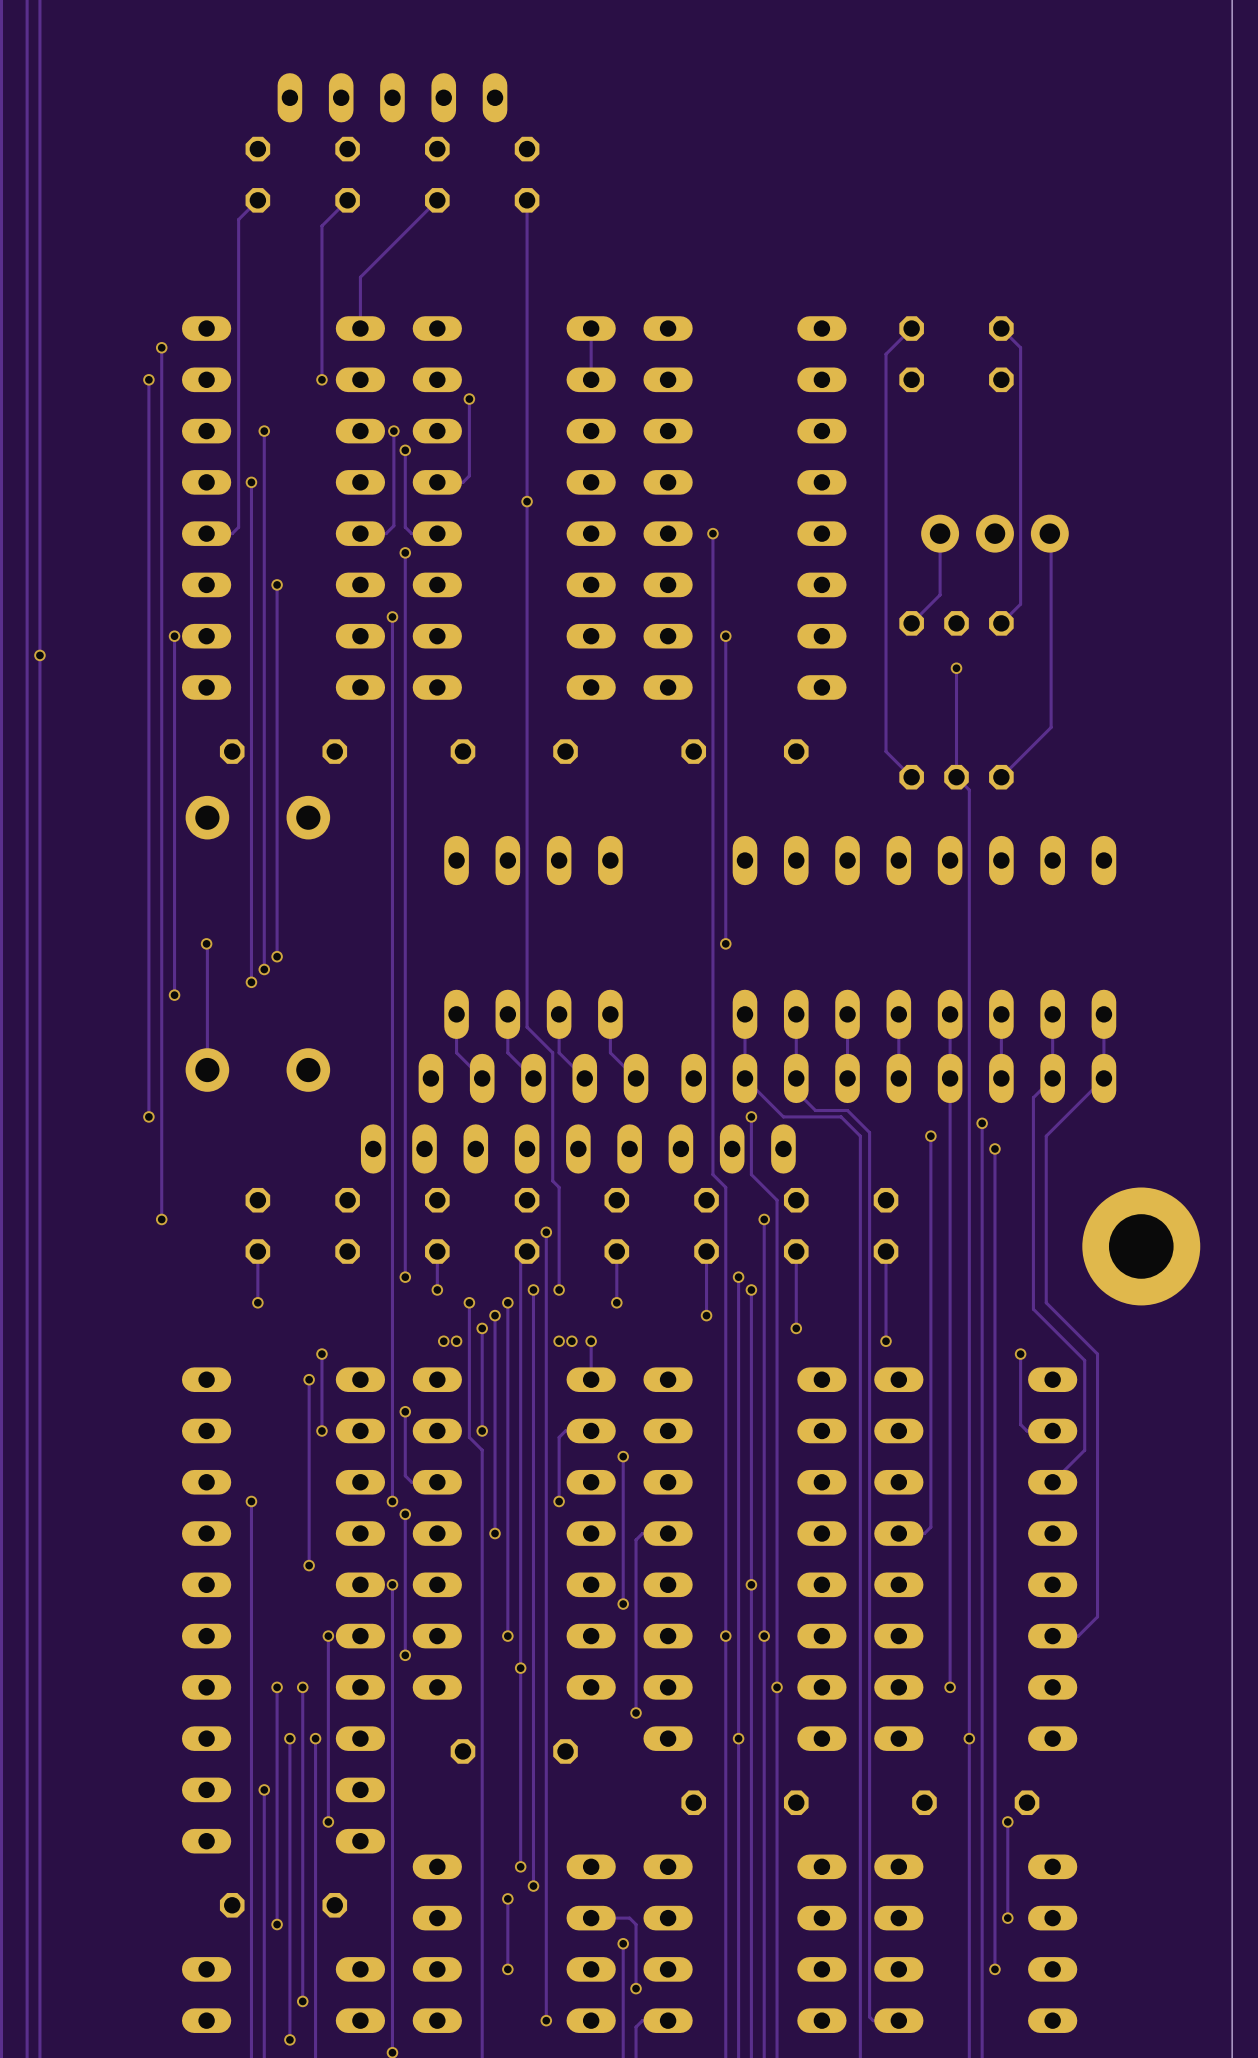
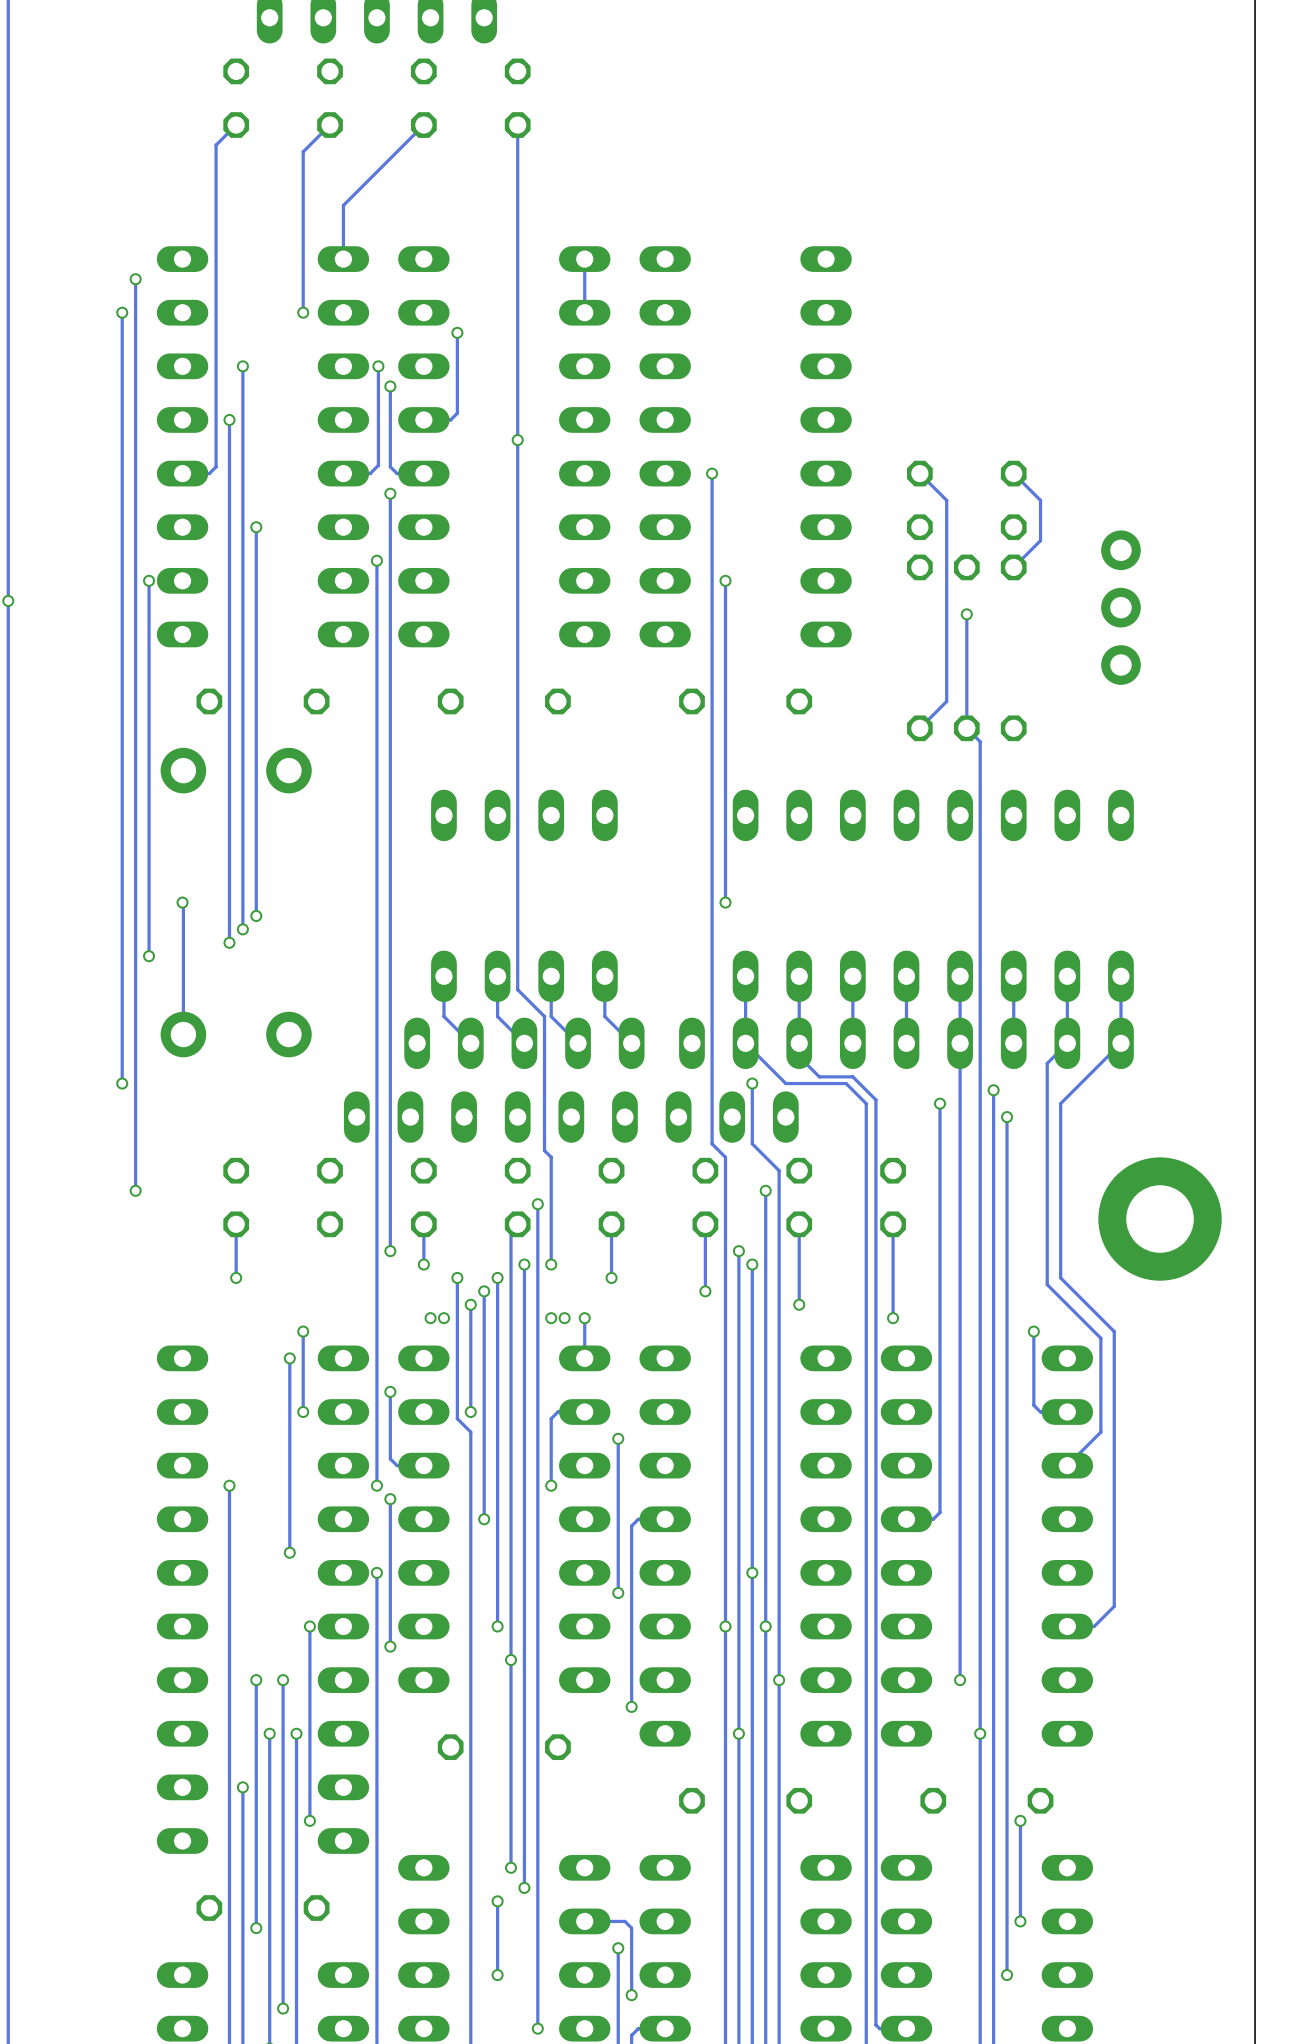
track: (911, 328) (886, 354) (886, 751) (911, 777) -> (919, 473) (946, 500) (946, 701) (919, 728)
track: (1001, 328) (1020, 347) (1020, 604) -> (1013, 473) (1040, 500) (1040, 540) (1033, 547)
part: (911, 354) -> none
part: (1001, 354) -> none
track: (940, 533) (940, 594) (911, 623) -> none
part rotation: 0° (994, 533) -> 90° clockwise (1120, 607)
part position: (994, 533) -> (1120, 607)
track: (1051, 533) (1051, 727) (1001, 777) -> none
part: none -> (919, 500)
part: none -> (1013, 500)

